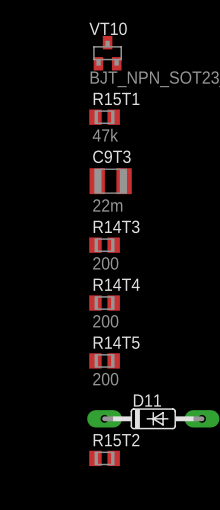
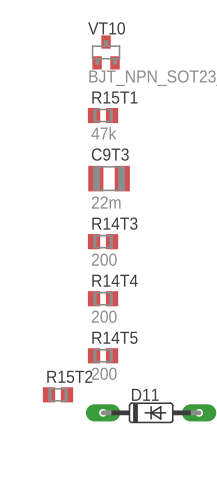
R15T2 position: (104, 458) -> (58, 394)

